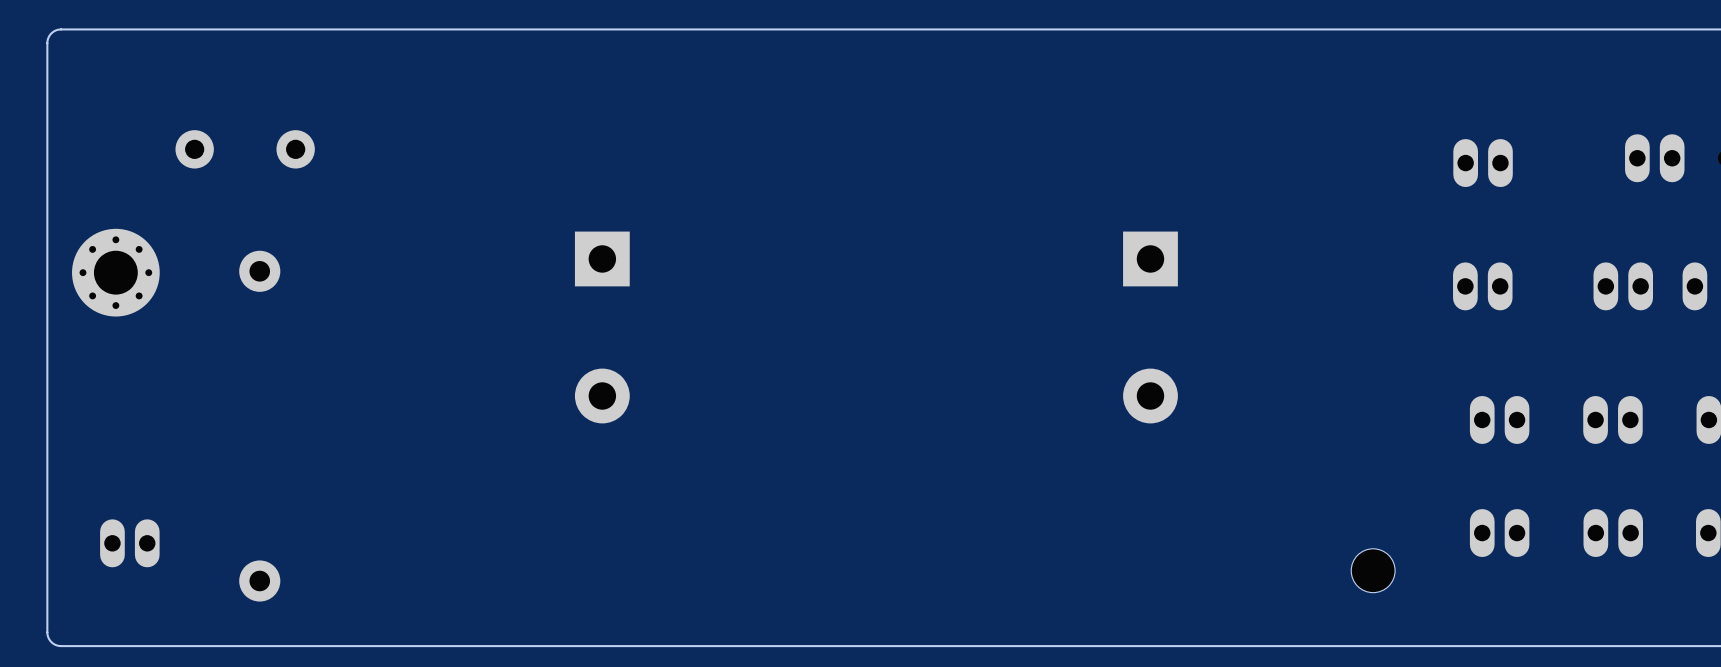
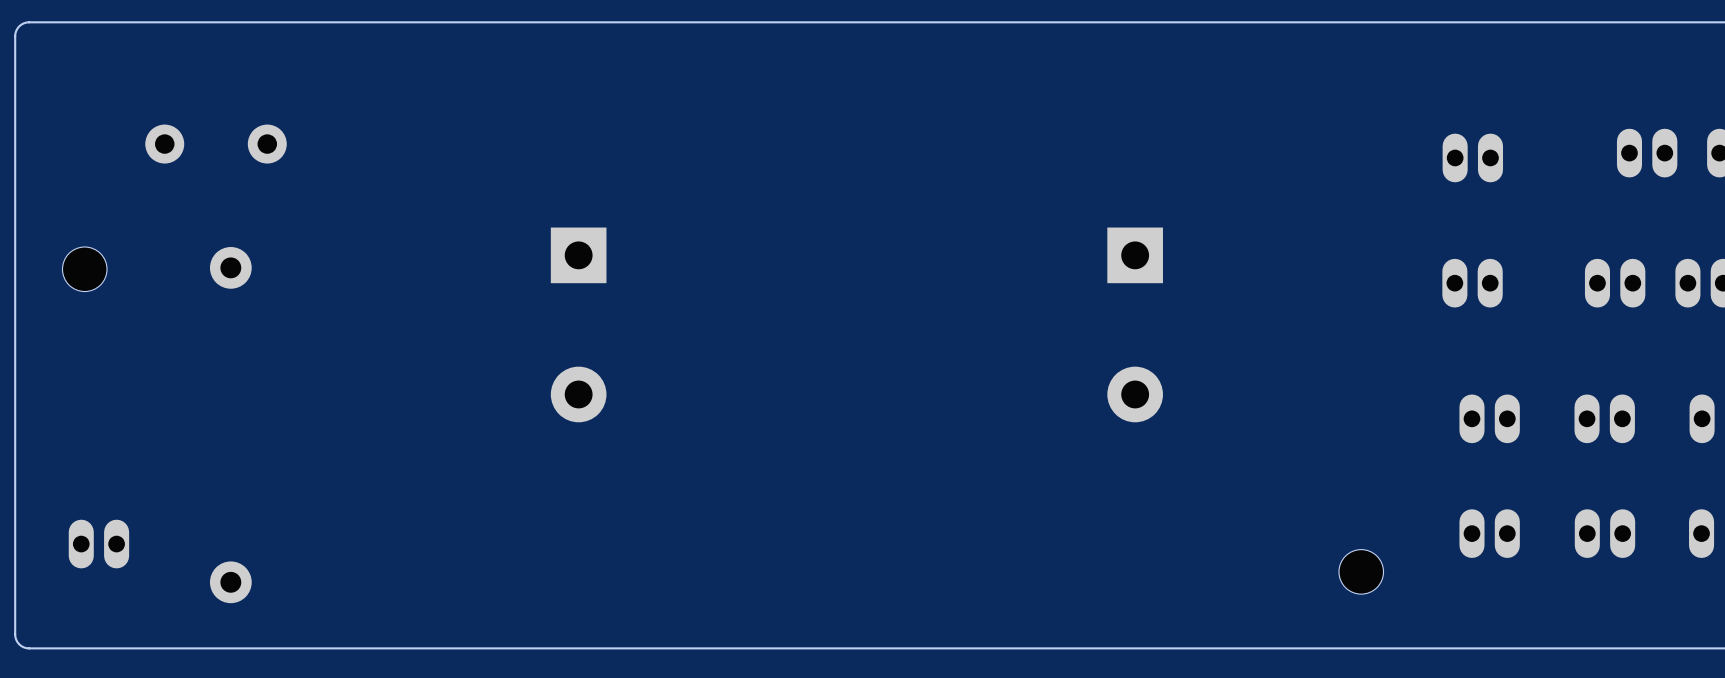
part footprint: [72, 228, 160, 317] -> [62, 247, 108, 292]

